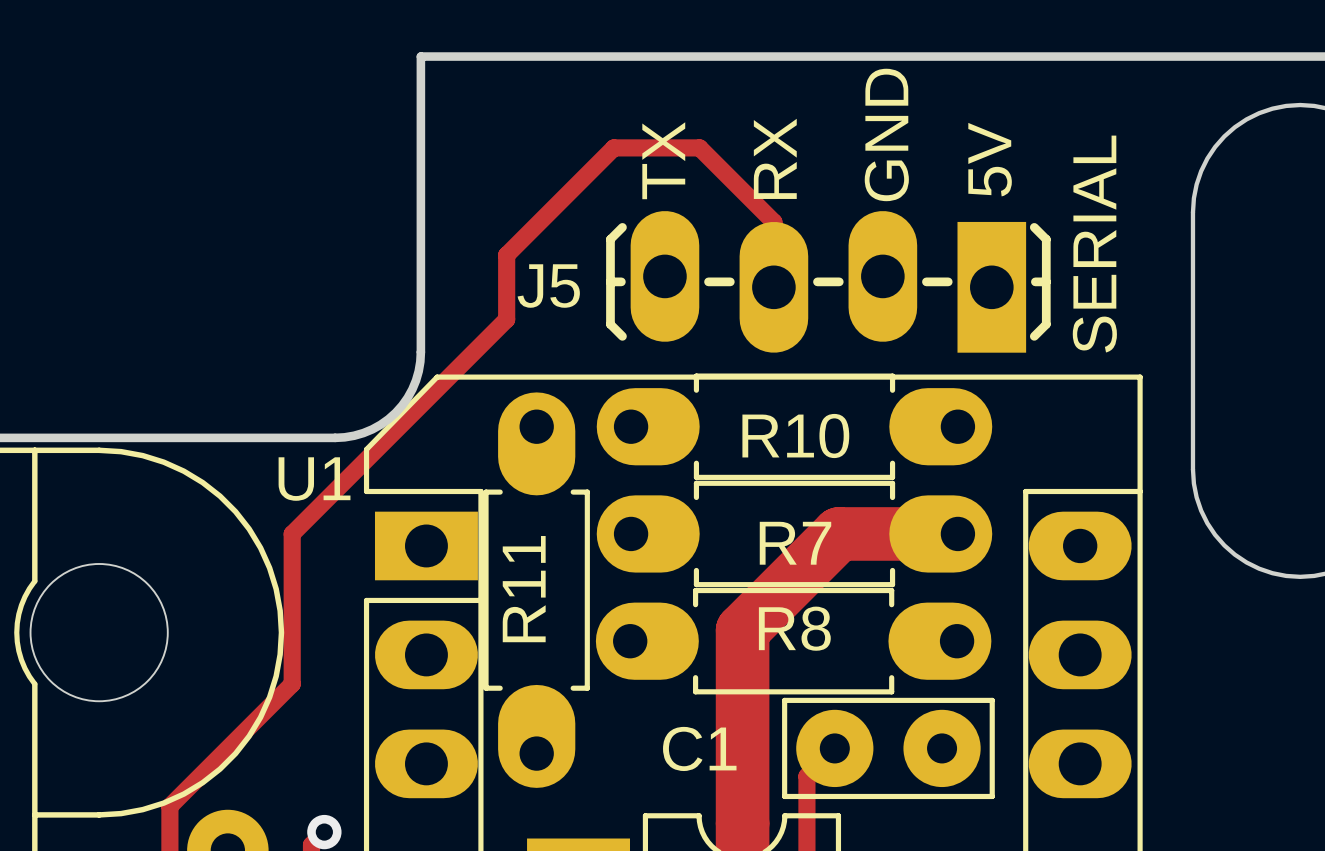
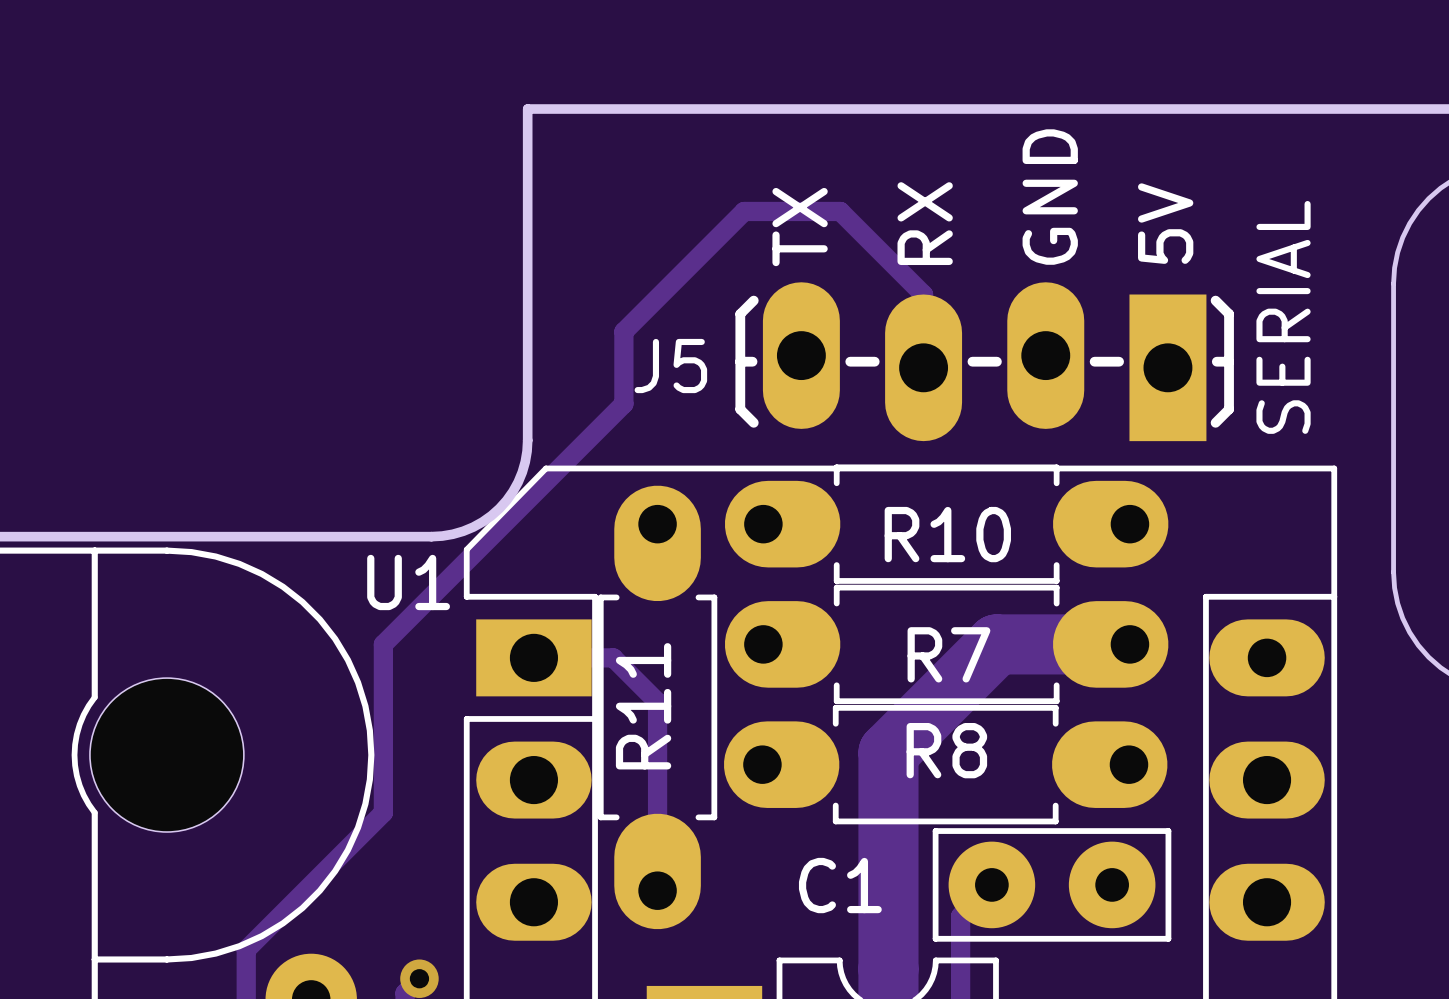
track: none -> (533, 657) (613, 657) (657, 702) (657, 890)

